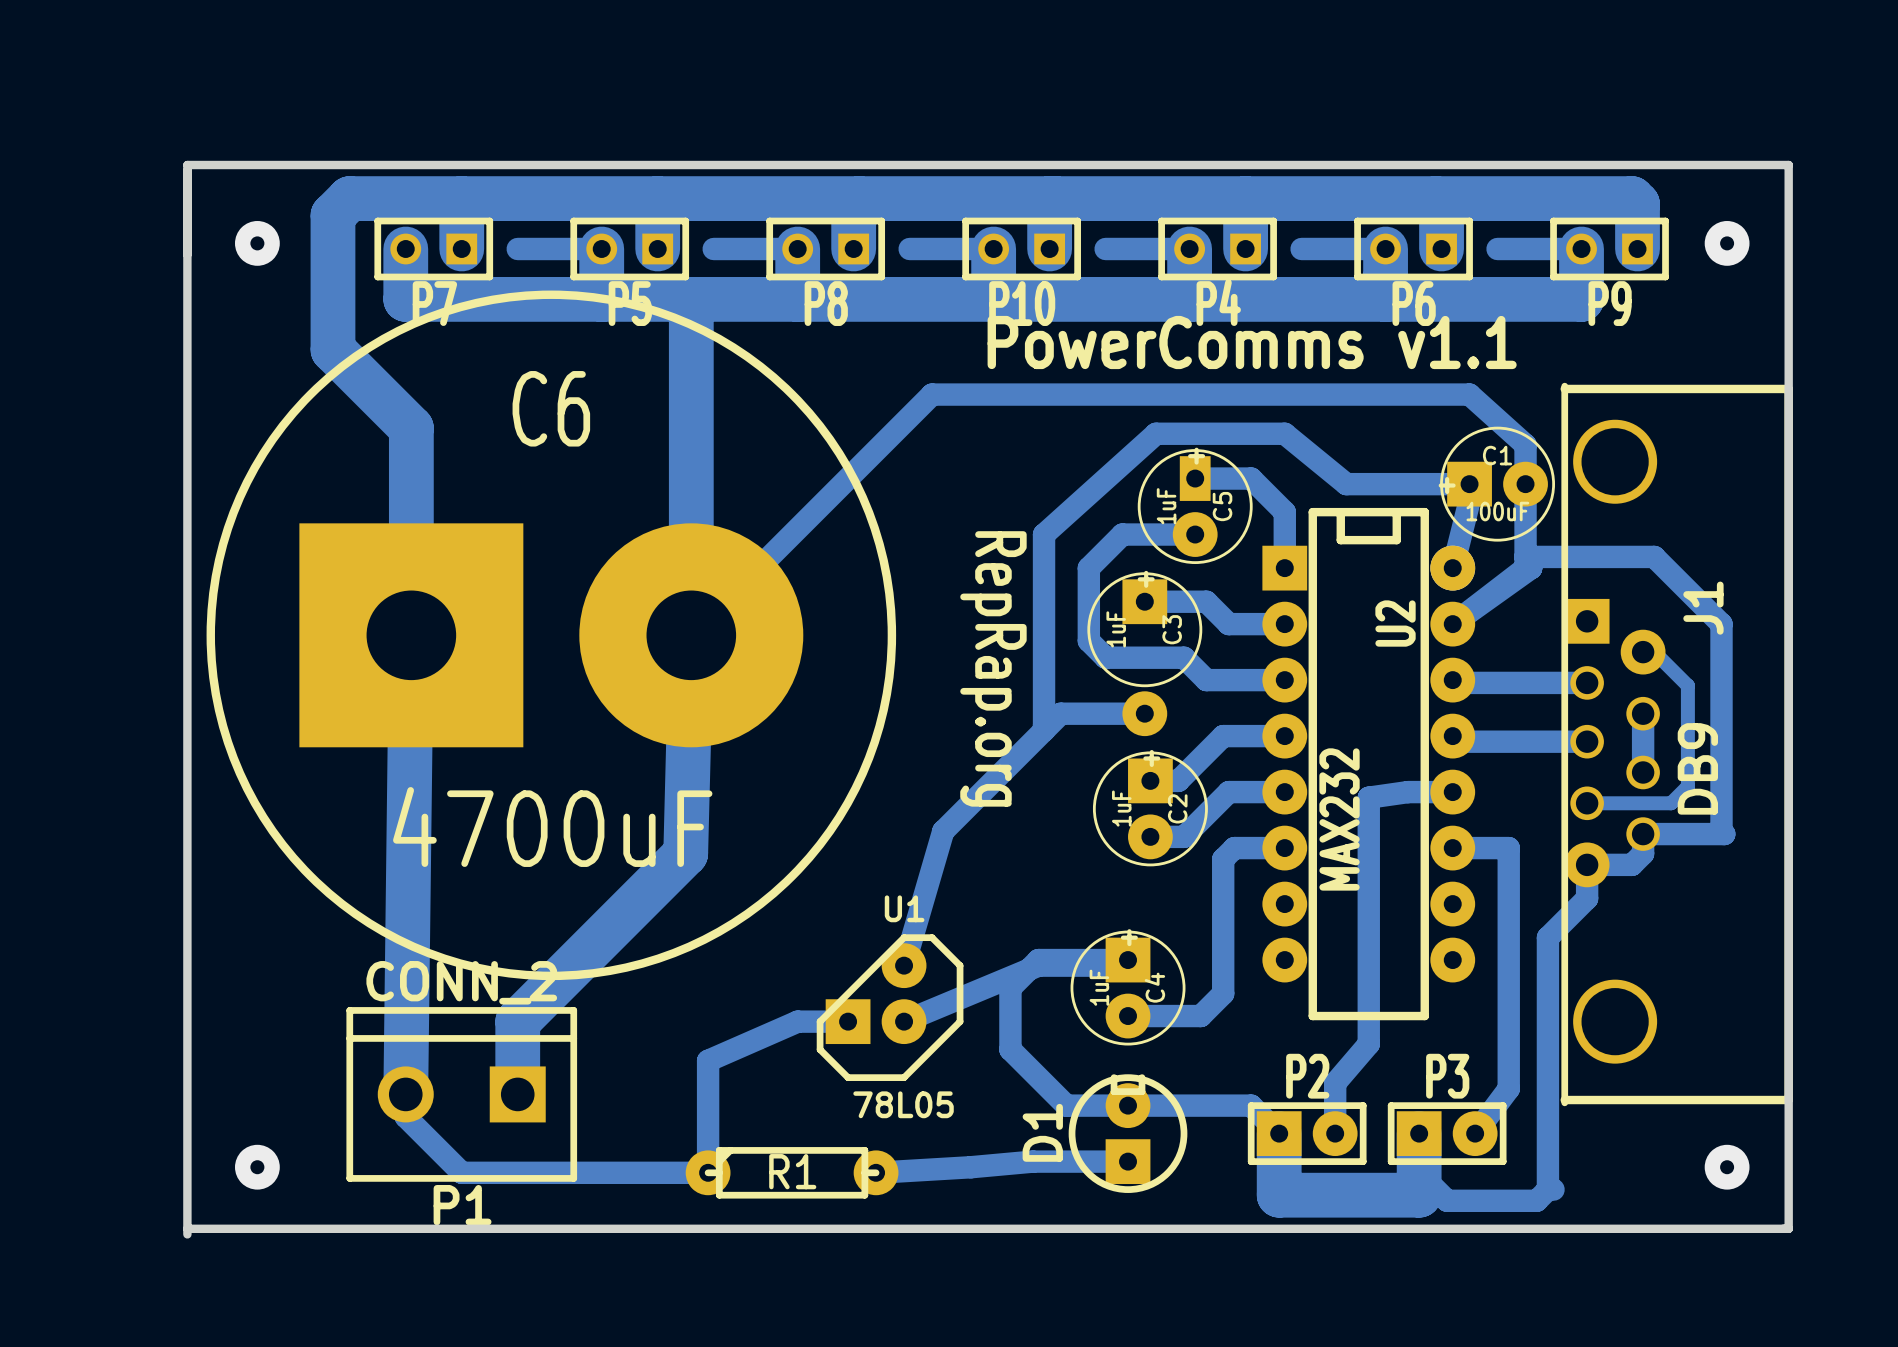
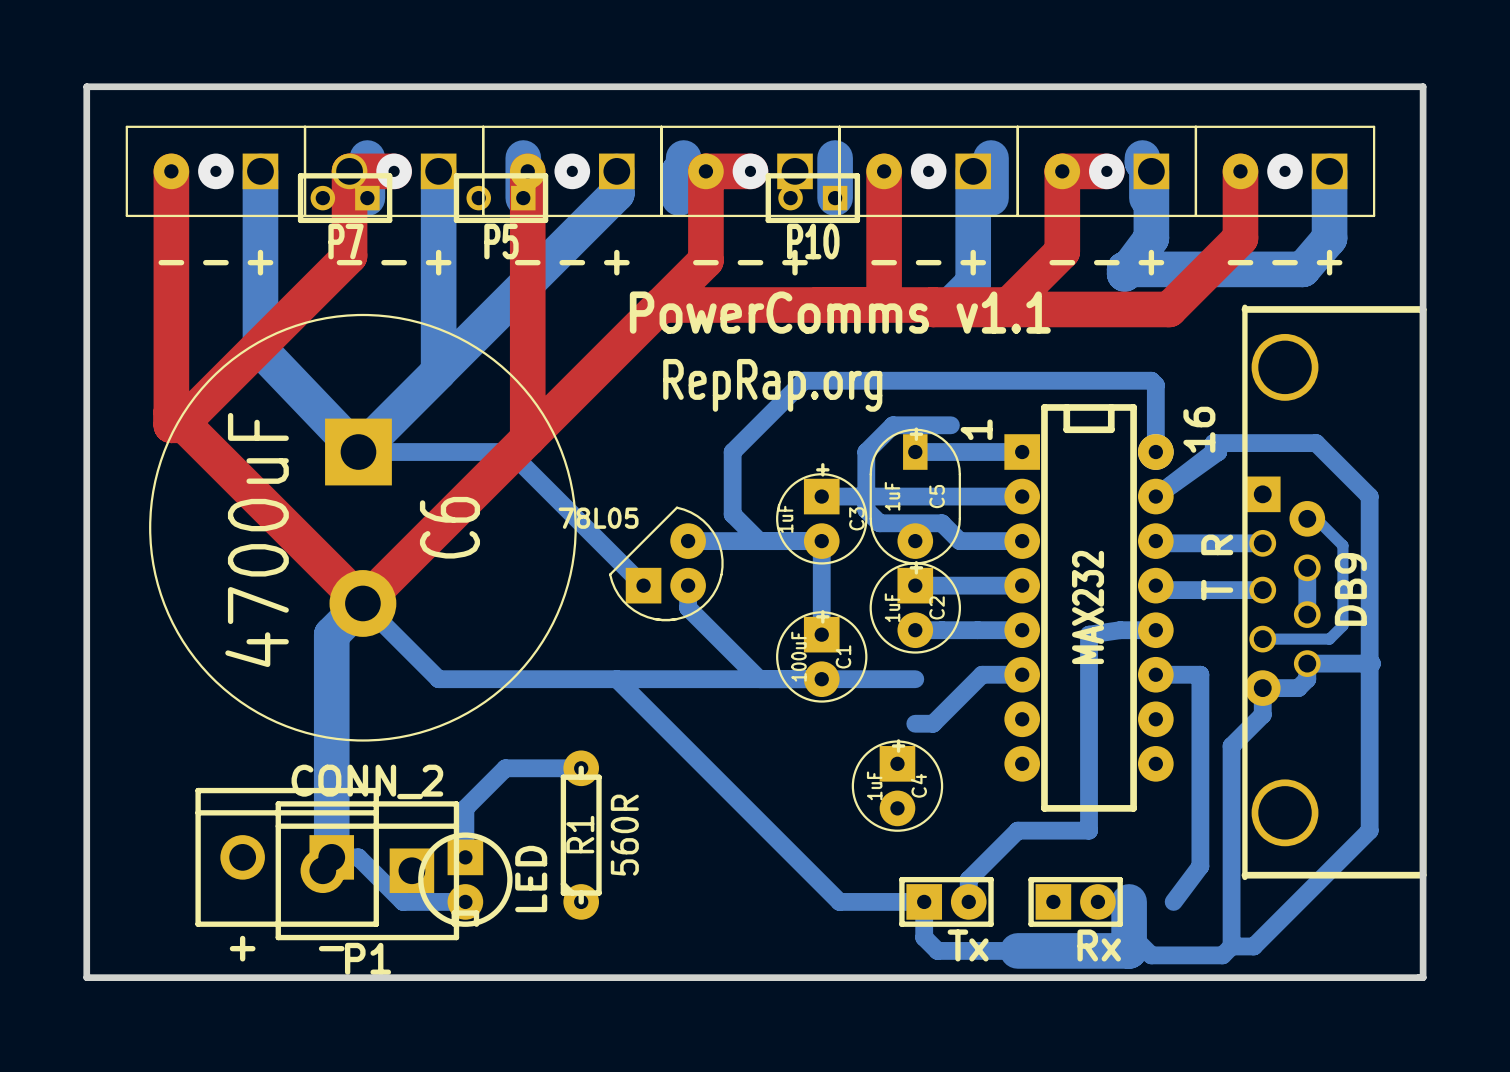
board edge: (1788, 165) (187, 165) (187, 1234) -> (1423, 131) (1423, 86) (86, 86) (86, 977) (149, 977)
top track: none -> (171, 171) (171, 425) (180, 425) (349, 256) (349, 171) (394, 171)
part: none -> (215, 171)
bottom track: none -> (260, 171) (260, 349) (358, 452)
part: none -> (394, 171)
via: none -> (394, 171)
bottom track: none -> (438, 171) (438, 371)
top track: none -> (527, 171) (527, 438)
part: none -> (572, 171)
via: none -> (572, 171)
bottom track: none -> (616, 171) (616, 193) (358, 452)
top track: none -> (750, 171) (705, 171) (705, 260) (362, 603) (171, 411)
part: none -> (750, 171)
via: none -> (750, 171)
top track: none -> (884, 171) (884, 296) (875, 305)
part: none -> (928, 171)
via: none -> (928, 171)
bottom track: none -> (973, 171) (973, 282) (955, 300)
top track: none -> (1106, 171) (1062, 171) (1062, 251) (1008, 305) (661, 305)
part: none -> (1106, 171)
via: none -> (1106, 171)
bottom track: none -> (1151, 171) (1151, 238) (1124, 273) (1124, 269) (1302, 269) (1329, 238) (1329, 171)
top track: none -> (1240, 171) (1240, 238) (1169, 309) (933, 309) (933, 305)
part: none -> (1285, 171)
via position: (257, 243) -> (215, 171)
via position: (1727, 243) -> (1285, 171)
bottom track: (405, 248) (405, 299) (1581, 299) (1581, 248) (1497, 248) -> none
bottom track: (517, 248) (601, 248) (601, 299) -> none
bottom track: (713, 248) (797, 248) (797, 299) -> none
P8: (825, 248) -> none
bottom track: (909, 248) (993, 248) (993, 299) -> none
bottom track: (1105, 248) (1189, 248) (1189, 299) -> none
P4: (1217, 248) -> none
bottom track: (1301, 248) (1385, 248) (1385, 299) -> none
P6: (1413, 248) -> none
P9: (1609, 248) -> none
bottom track: (1637, 248) (1637, 204) (1631, 198) (349, 198) (332, 215) (332, 349) (411, 428) (411, 635) (405, 1116) (461, 1172) (708, 1172) (708, 1060) (797, 1021) (848, 1021) -> none
C6 footprint: [206, 290, 897, 981] -> [149, 313, 577, 742]
bottom track: (685, 299) (685, 304) (691, 310) (691, 635) -> none
text position: PowerComms v1.1 (1252, 342) -> PowerComms v1.1 (840, 312)
C6 name position: C6 (551, 408) -> C6 (449, 527)
C5 footprint: [1137, 449, 1253, 565] -> [869, 428, 961, 565]
bottom track: none -> (950, 380) (803, 380) (732, 452) (732, 514) (759, 541)
bottom track: (1251, 478) (1284, 512) (1284, 568) -> (915, 452) (1022, 452)
C1 rotation: 0° (1497, 484) -> 90° clockwise (821, 656)
C1 position: (1497, 484) -> (821, 656)
U2 text: none -> 1 (976, 429)
U2 text: none -> 16 (1199, 429)
bottom track: (1525, 556) (1525, 444) (1469, 394) (932, 394) (691, 635) -> none
bottom track: none -> (358, 452) (509, 452) (643, 585)
bottom track: (1452, 568) (1469, 500) (1469, 484) (1346, 484) (1284, 433) (1156, 433) (1044, 534) (1044, 730) -> (1155, 452) (1155, 385) (1151, 380) (995, 380)
C3 footprint: [1087, 572, 1203, 737] -> [776, 473, 868, 565]
bottom track: (1144, 601) (1206, 601) (1228, 624) -> (821, 496) (977, 496)
J1 name: J1 (1703, 608) -> none
U2 name: U2 (1395, 623) -> none
bottom track: (691, 635) (685, 853) (517, 1021) (517, 1094) -> none
text rotation: 0° (993, 668) -> 90° counterclockwise (772, 385)
bottom track: none -> (688, 541) (821, 541) (821, 634)
J1 text: none -> R (1217, 544)
part: none -> 78L05 (666, 563)
bottom track: (1144, 713) (1060, 713) (943, 831) (904, 965) -> none
bottom track: none -> (688, 585) (688, 607) (759, 679)
bottom track: (1223, 736) (1178, 780) (1150, 780) -> (973, 585) (915, 585)
J1 text: none -> T (1217, 590)
J1 value position: DB9 (1697, 768) -> DB9 (1350, 589)
bottom track: (1228, 792) (1184, 836) (1150, 836) -> (977, 630) (915, 630)
C2 position: (1150, 808) -> (915, 607)
U2 value position: MAX232 (1339, 819) -> MAX232 (1088, 607)
C6 value position: 4700uF (552, 827) -> 4700uF (257, 539)
bottom track: none -> (1369, 661) (1369, 830) (1253, 946) (1236, 946)
bottom track: none -> (915, 679) (438, 679) (362, 603) (331, 634) (331, 857) (358, 857) (403, 901) (465, 901)
bottom track: (1223, 859) (1223, 993) (1200, 1016) (1128, 1016) -> (973, 683) (933, 723) (915, 723)
bottom track: none -> (581, 768) (505, 768) (465, 808) (465, 857)
U1: 78L05 (890, 1007) -> none
bottom track: (904, 1021) (1038, 965) (1122, 965) (1128, 960) (1038, 960) (1010, 988) (1010, 1049) (1066, 1105) (1251, 1105) (1279, 1133) (1279, 1195) -> (616, 679) (839, 901) (924, 901) (924, 937) (937, 950) (1017, 950)
bottom track: (1368, 1044) (1335, 1083) (1335, 1133) -> (1089, 830) (1017, 830) (968, 879) (968, 901)
R1 value: none -> 560R (624, 835)
part: none -> (287, 857)
part: none -> LED (465, 879)
D1: (1128, 1133) -> none
part: none -> (946, 901)
P2: (1307, 1133) -> none
part: none -> (1075, 901)
P3: (1447, 1133) -> none
bottom track: (1128, 1161) (1032, 1161) (876, 1172) -> none
via: (257, 1167) -> none
via: (1727, 1167) -> none
R1 rotation: 0° (792, 1172) -> 90° counterclockwise (581, 835)
R1 position: (792, 1172) -> (581, 835)

